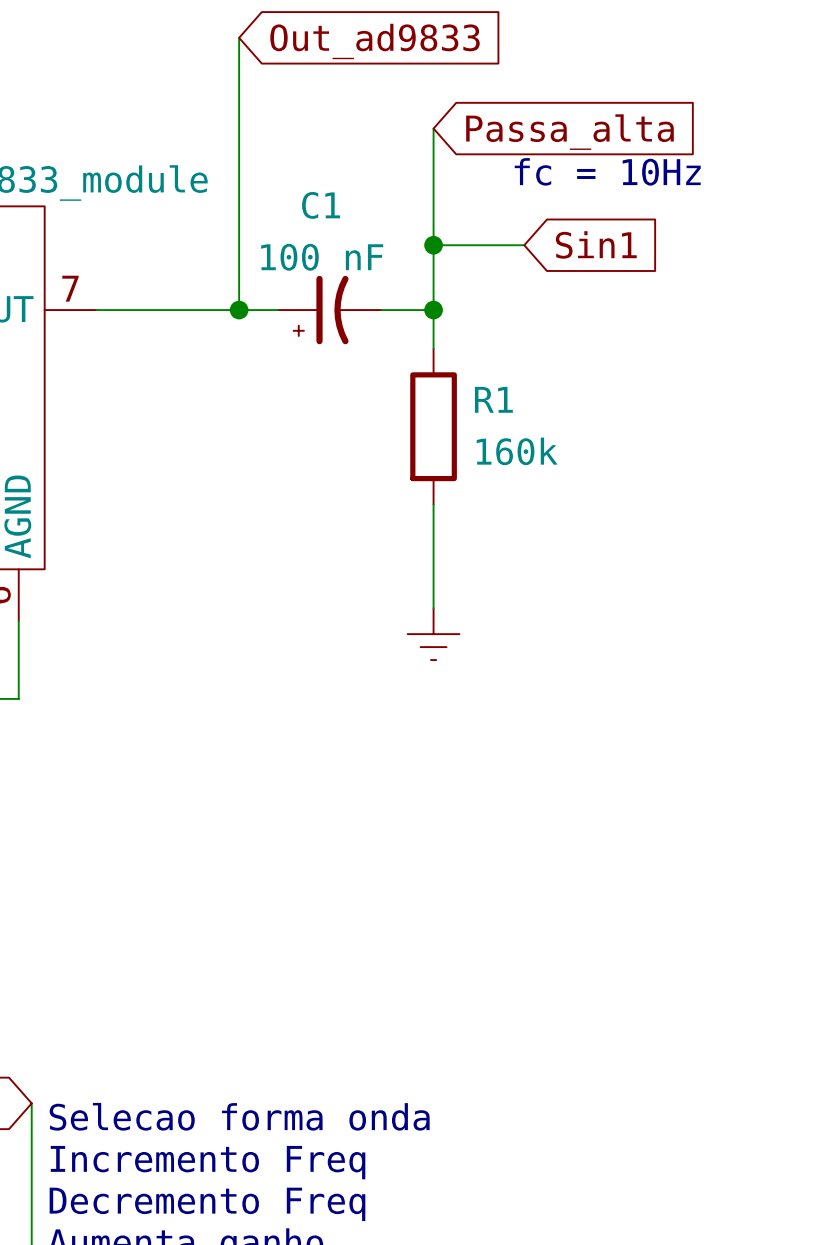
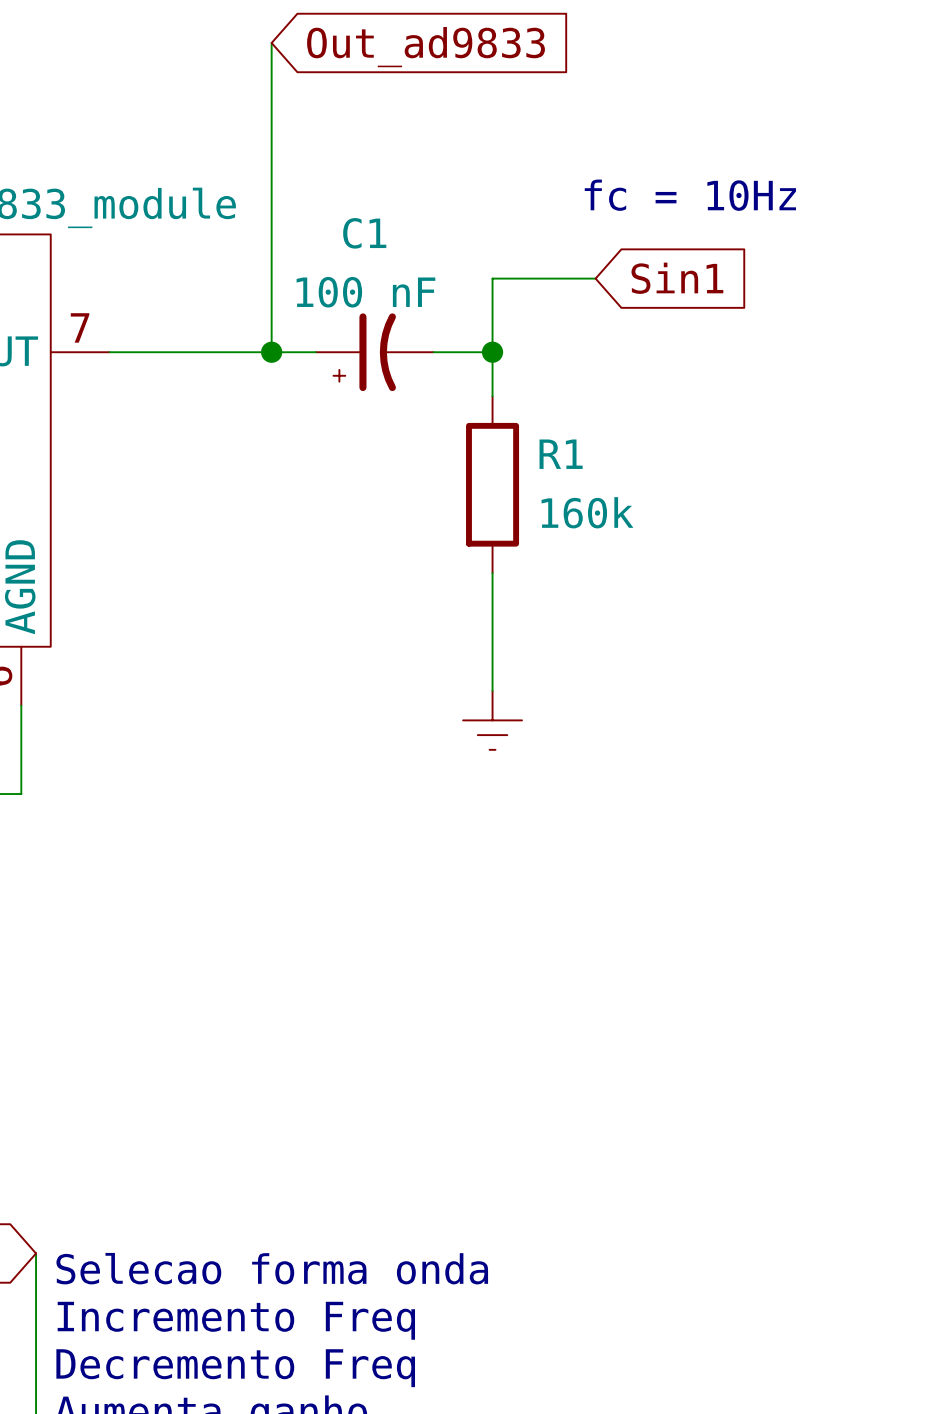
wire: (433, 128) (433, 245) -> none
global label: Passa_alta (569, 132) -> none
junction: (433, 245) -> none

